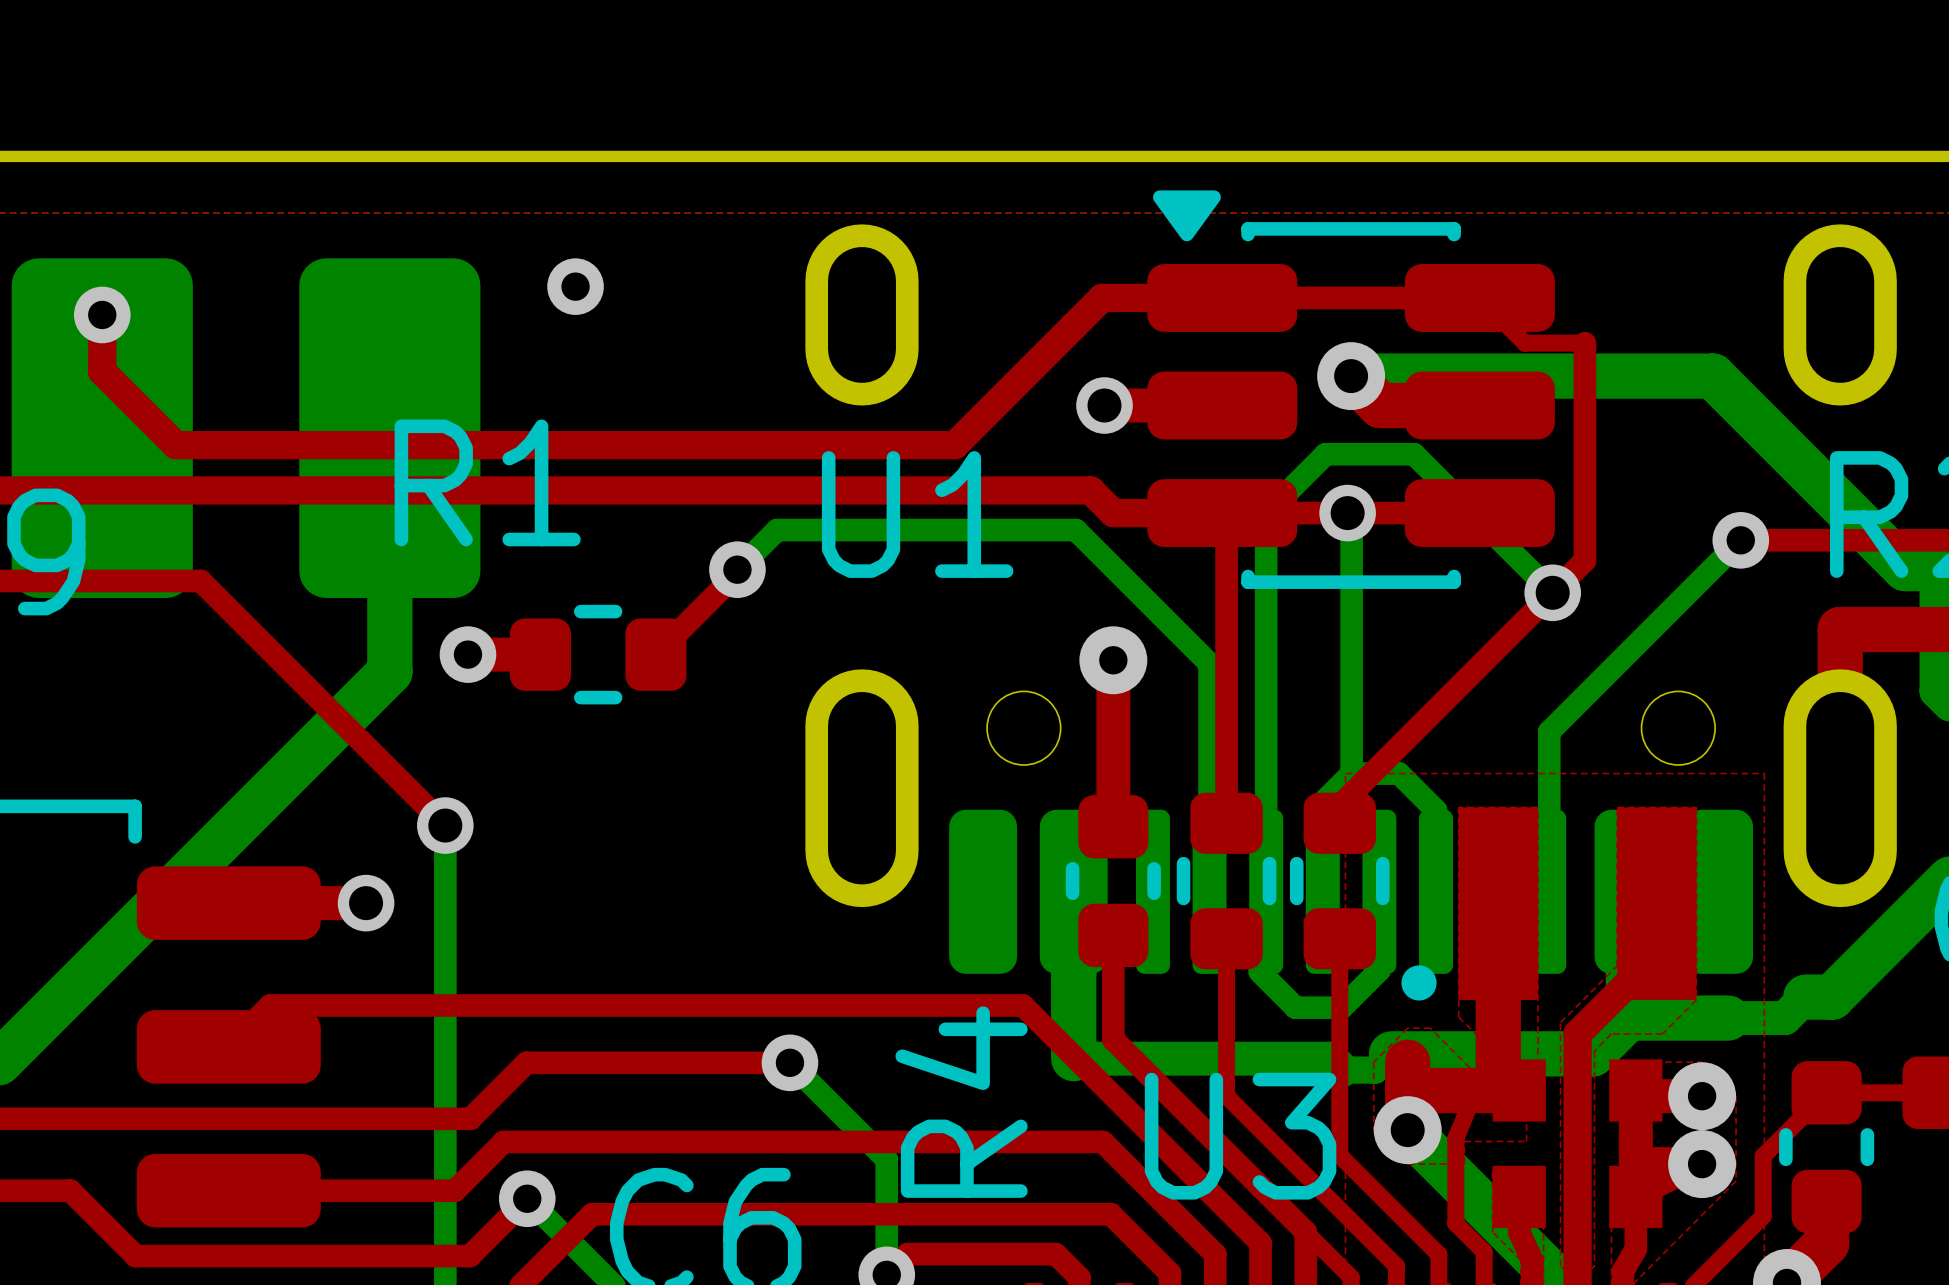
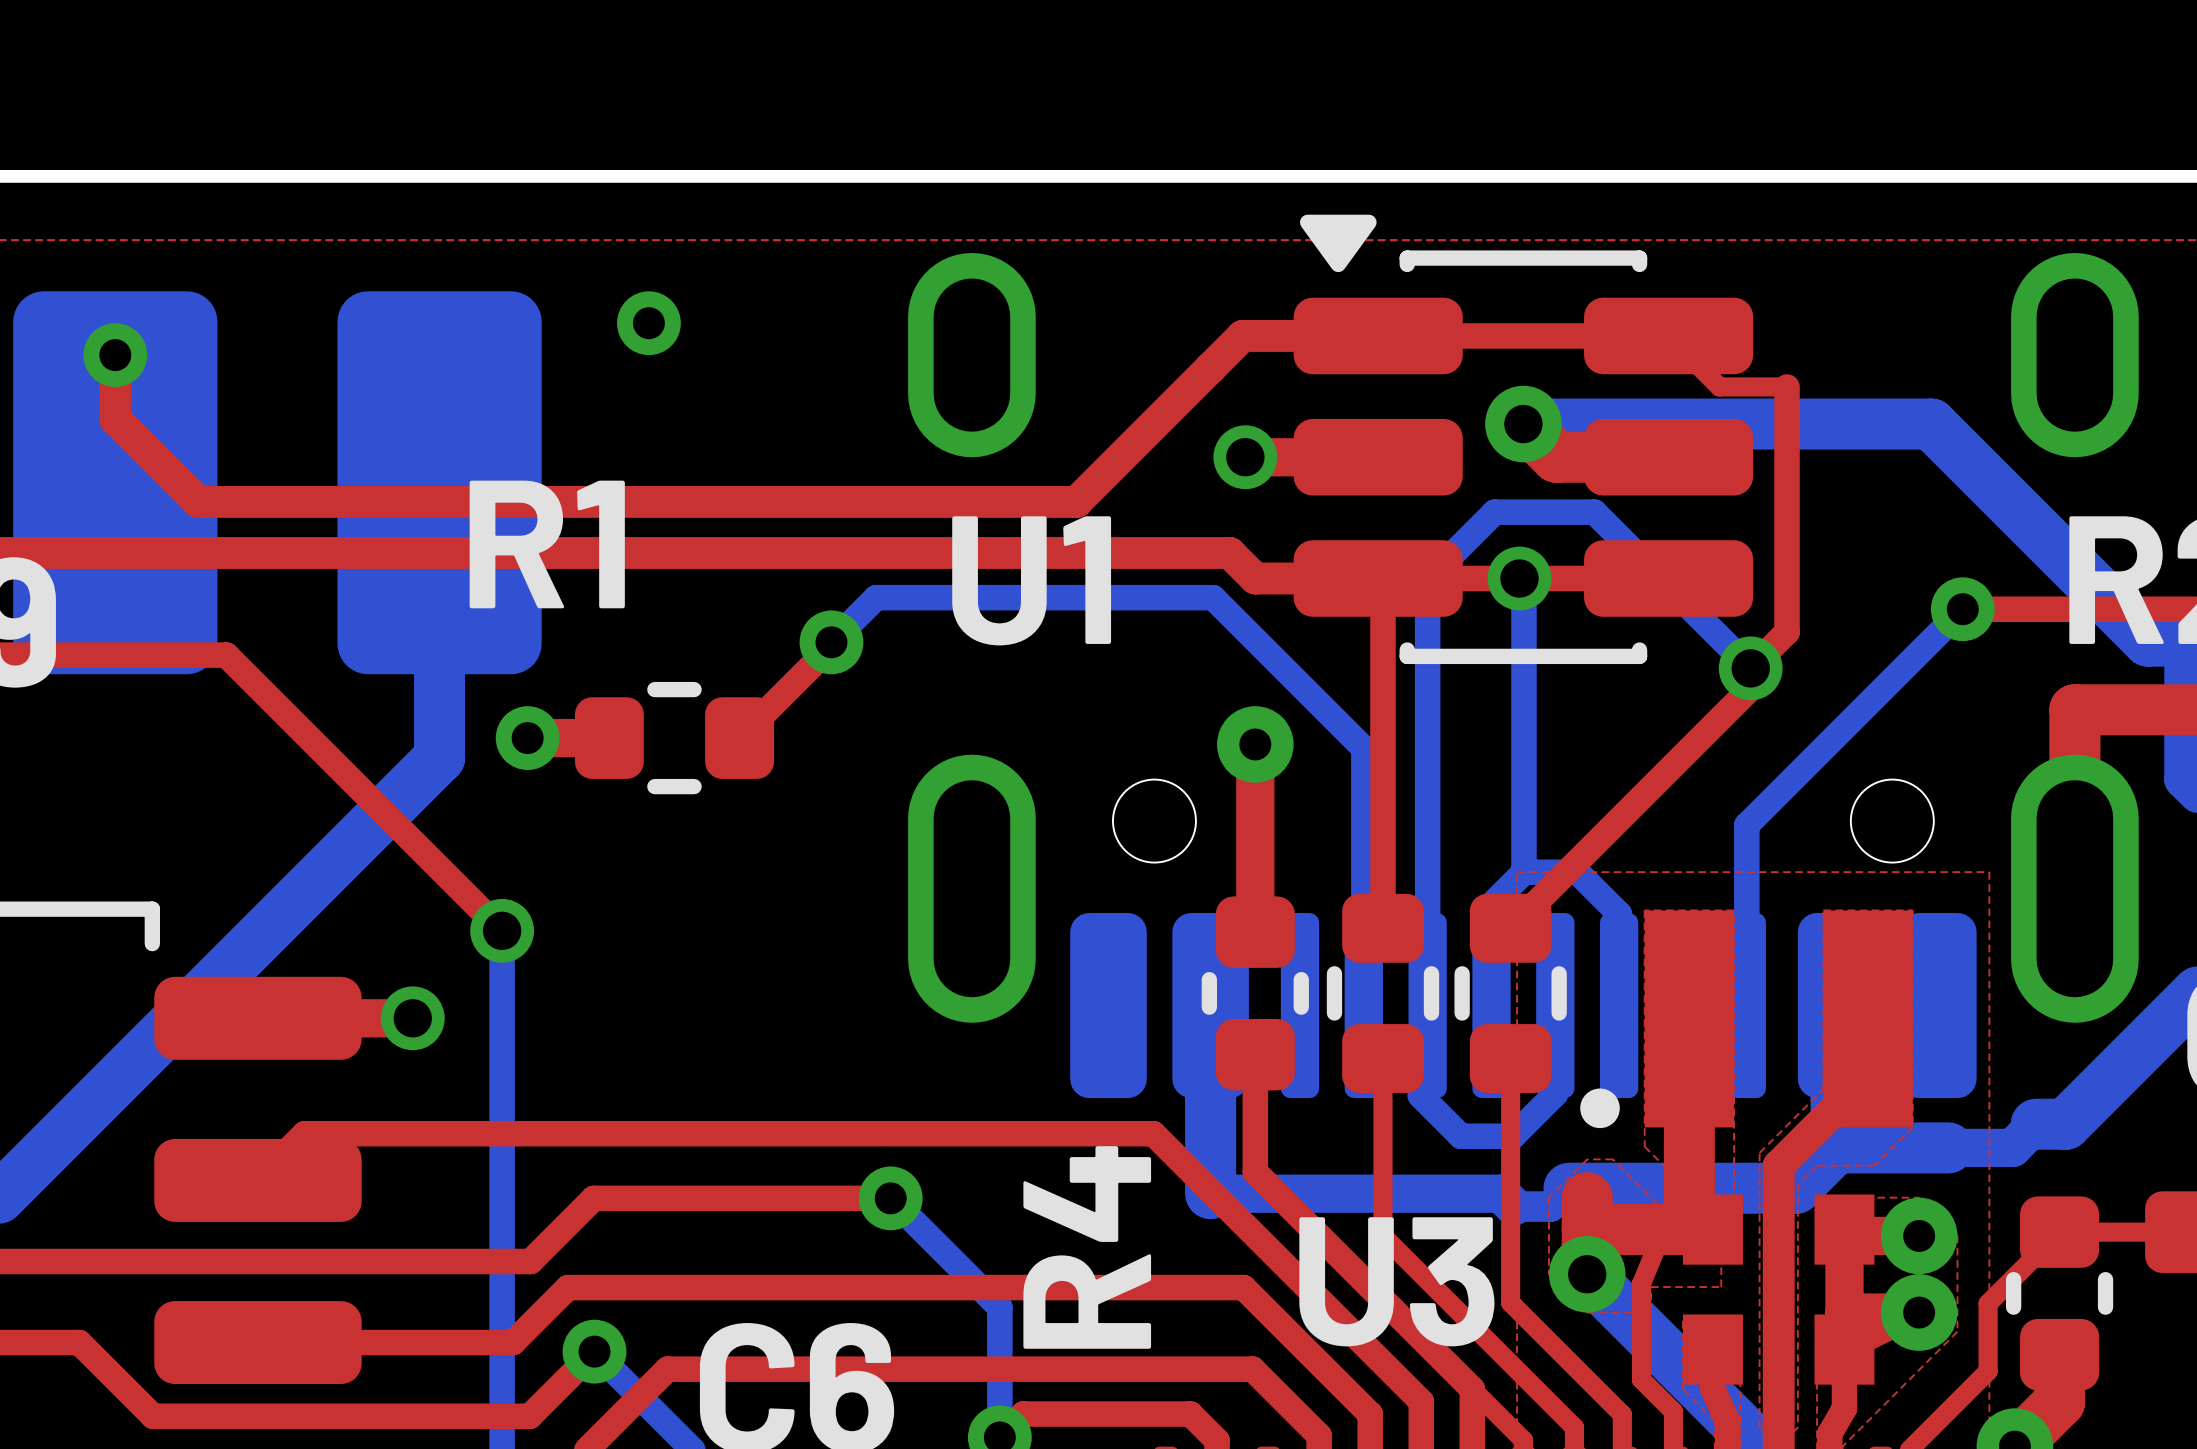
top track: (1552, 592) (1339, 805) -> (1750, 668) (1750, 688) (1510, 928)

